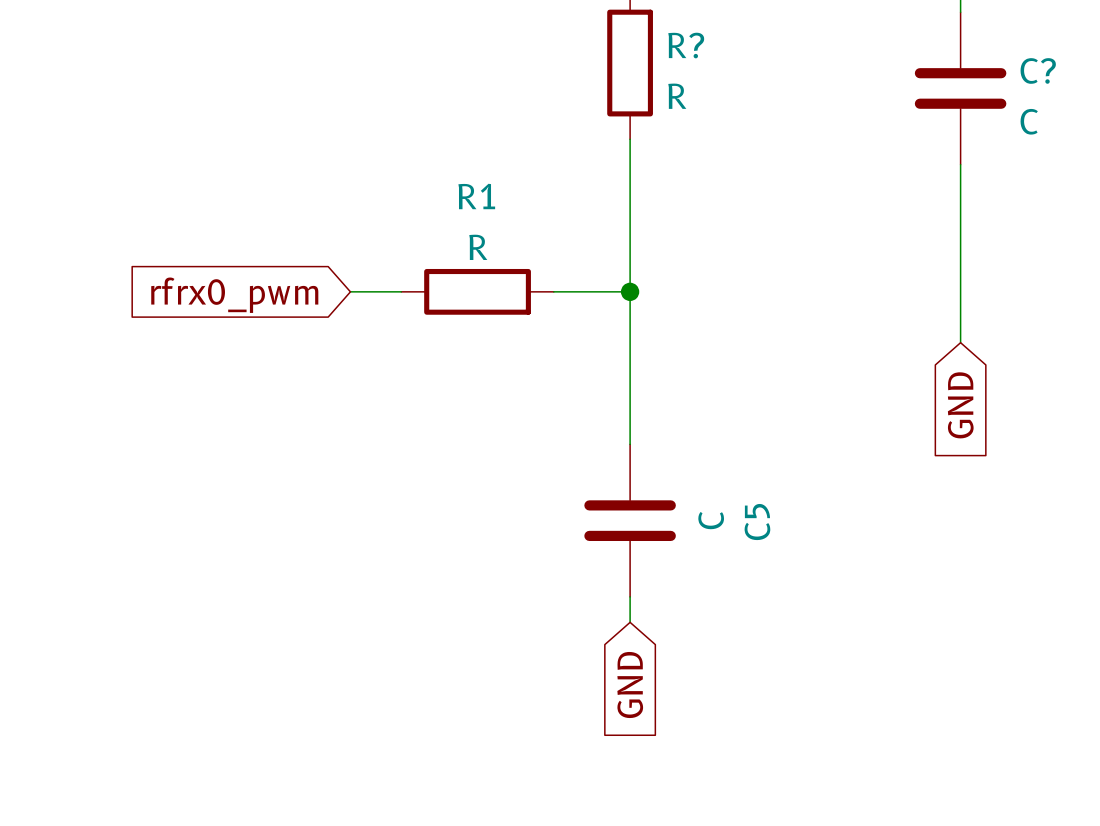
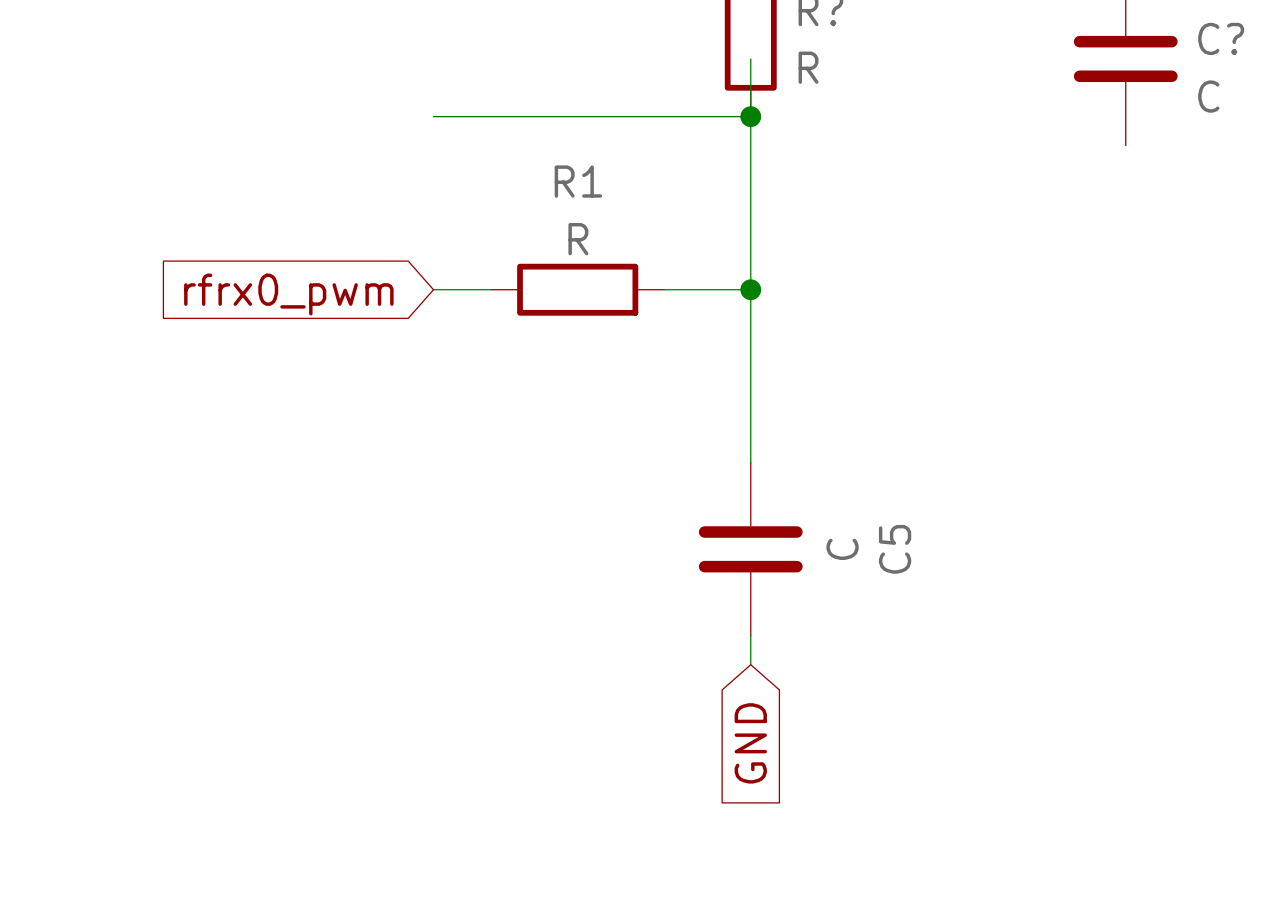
wire: none -> (750, 58) (750, 116) (433, 116)
junction: none -> (750, 116)
wire: (960, 164) (960, 342) -> none
global label: GND (960, 405) -> none

